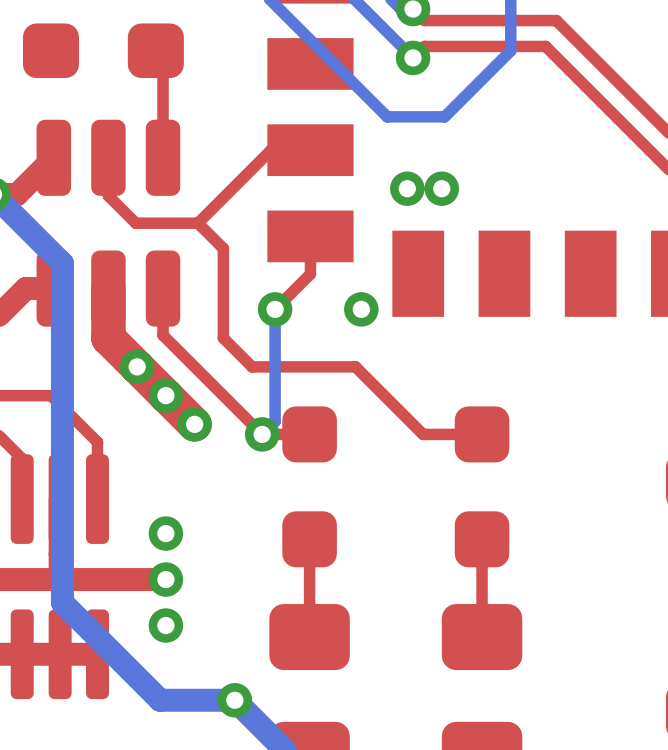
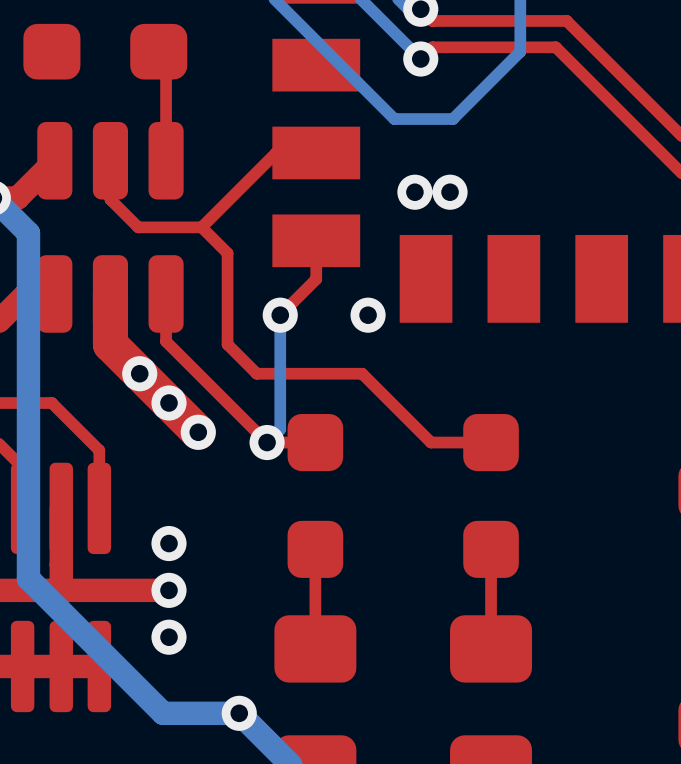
bottom track: (27, 228) (62, 263) (62, 602) -> (28, 233) (28, 578) (63, 613)

